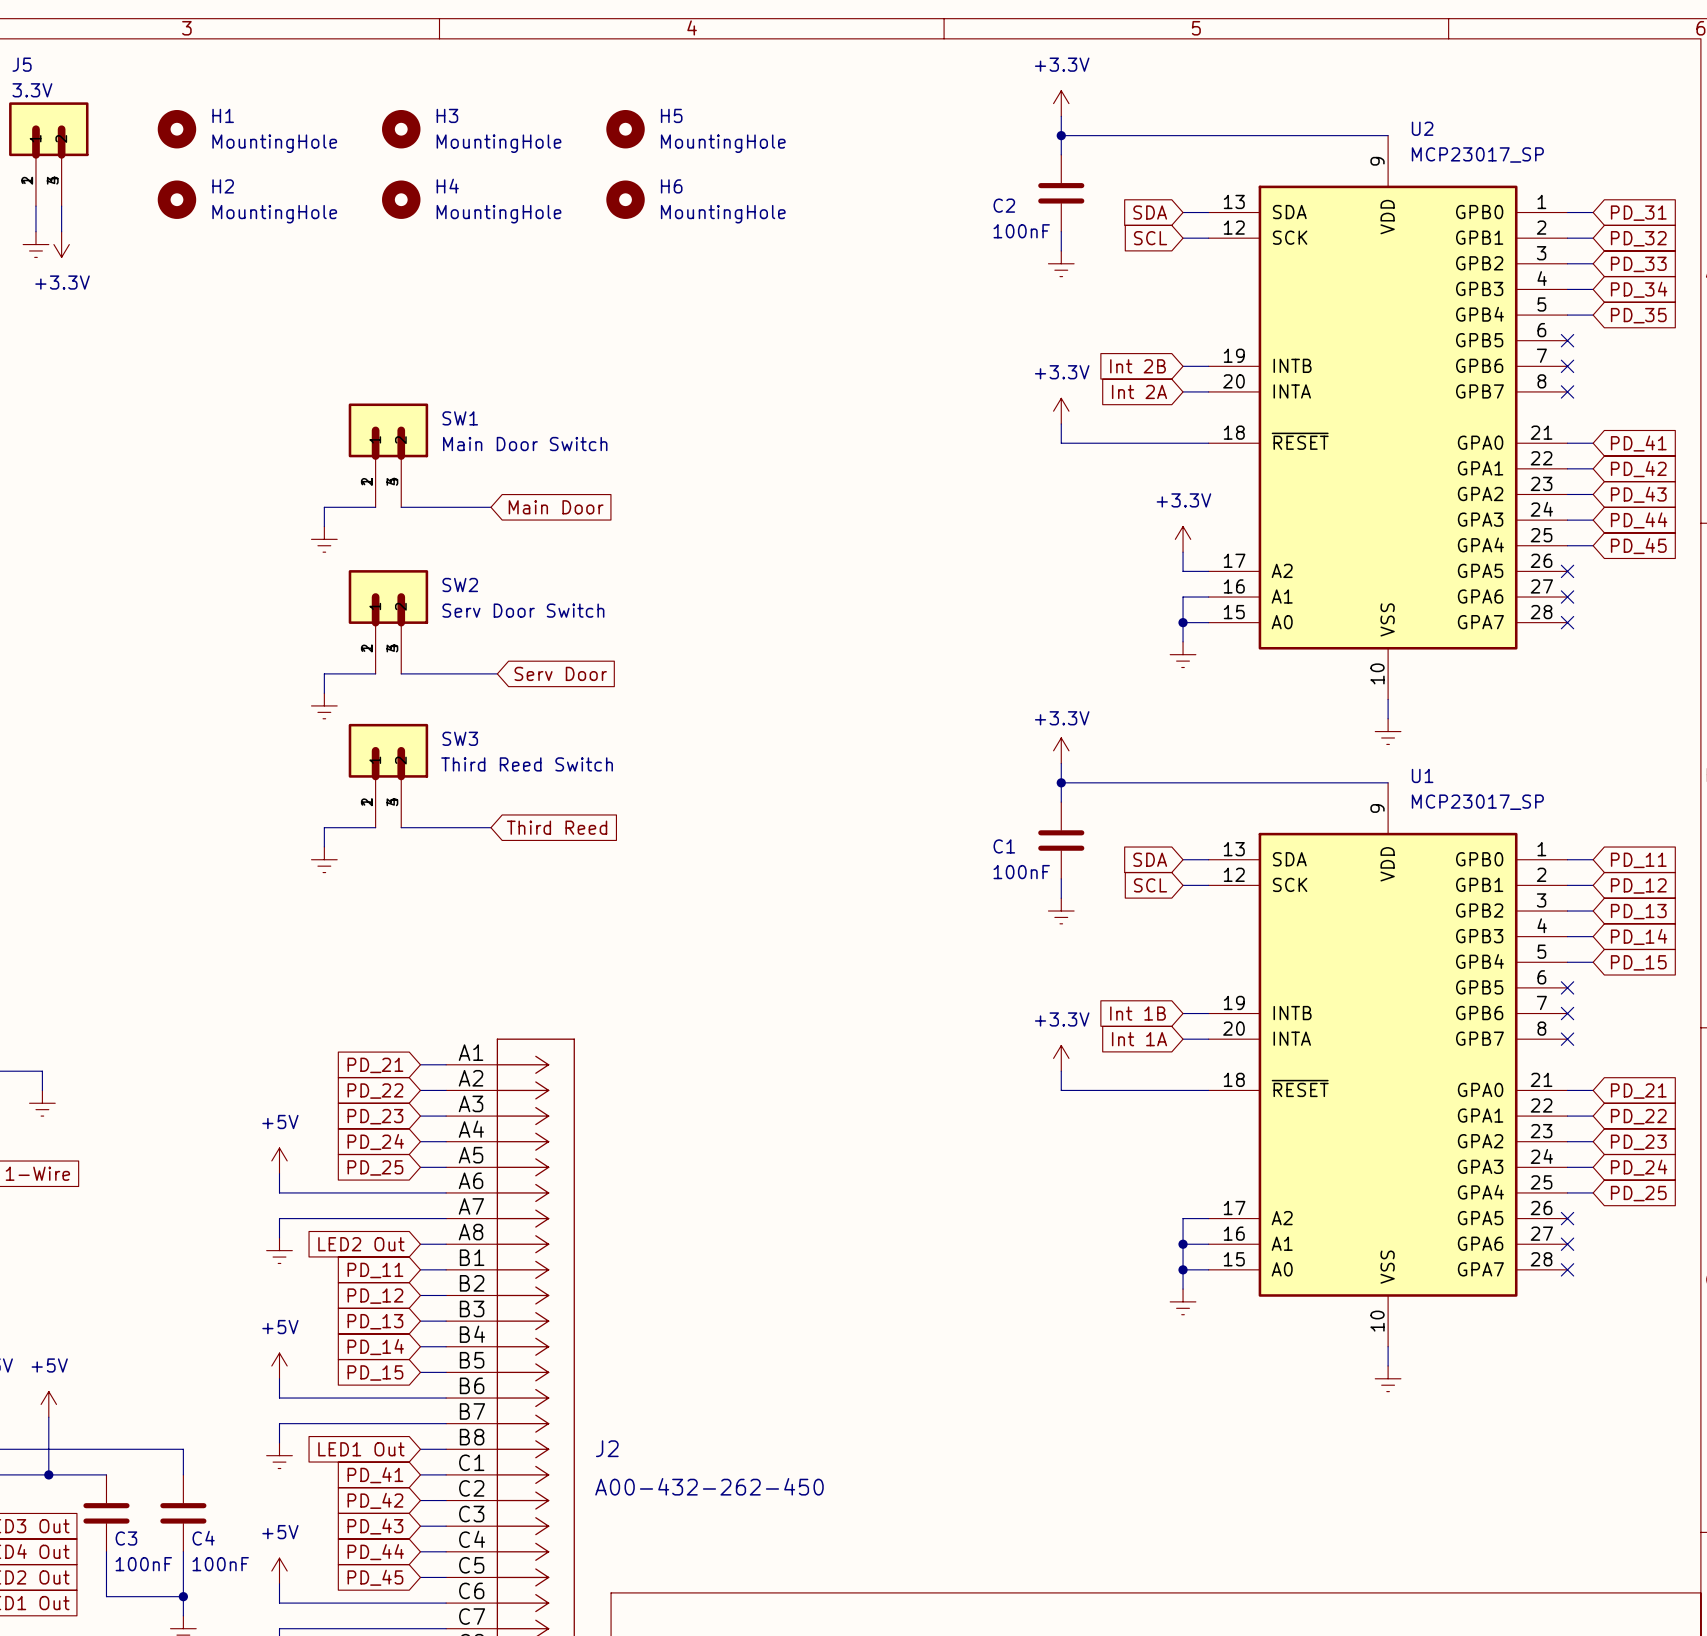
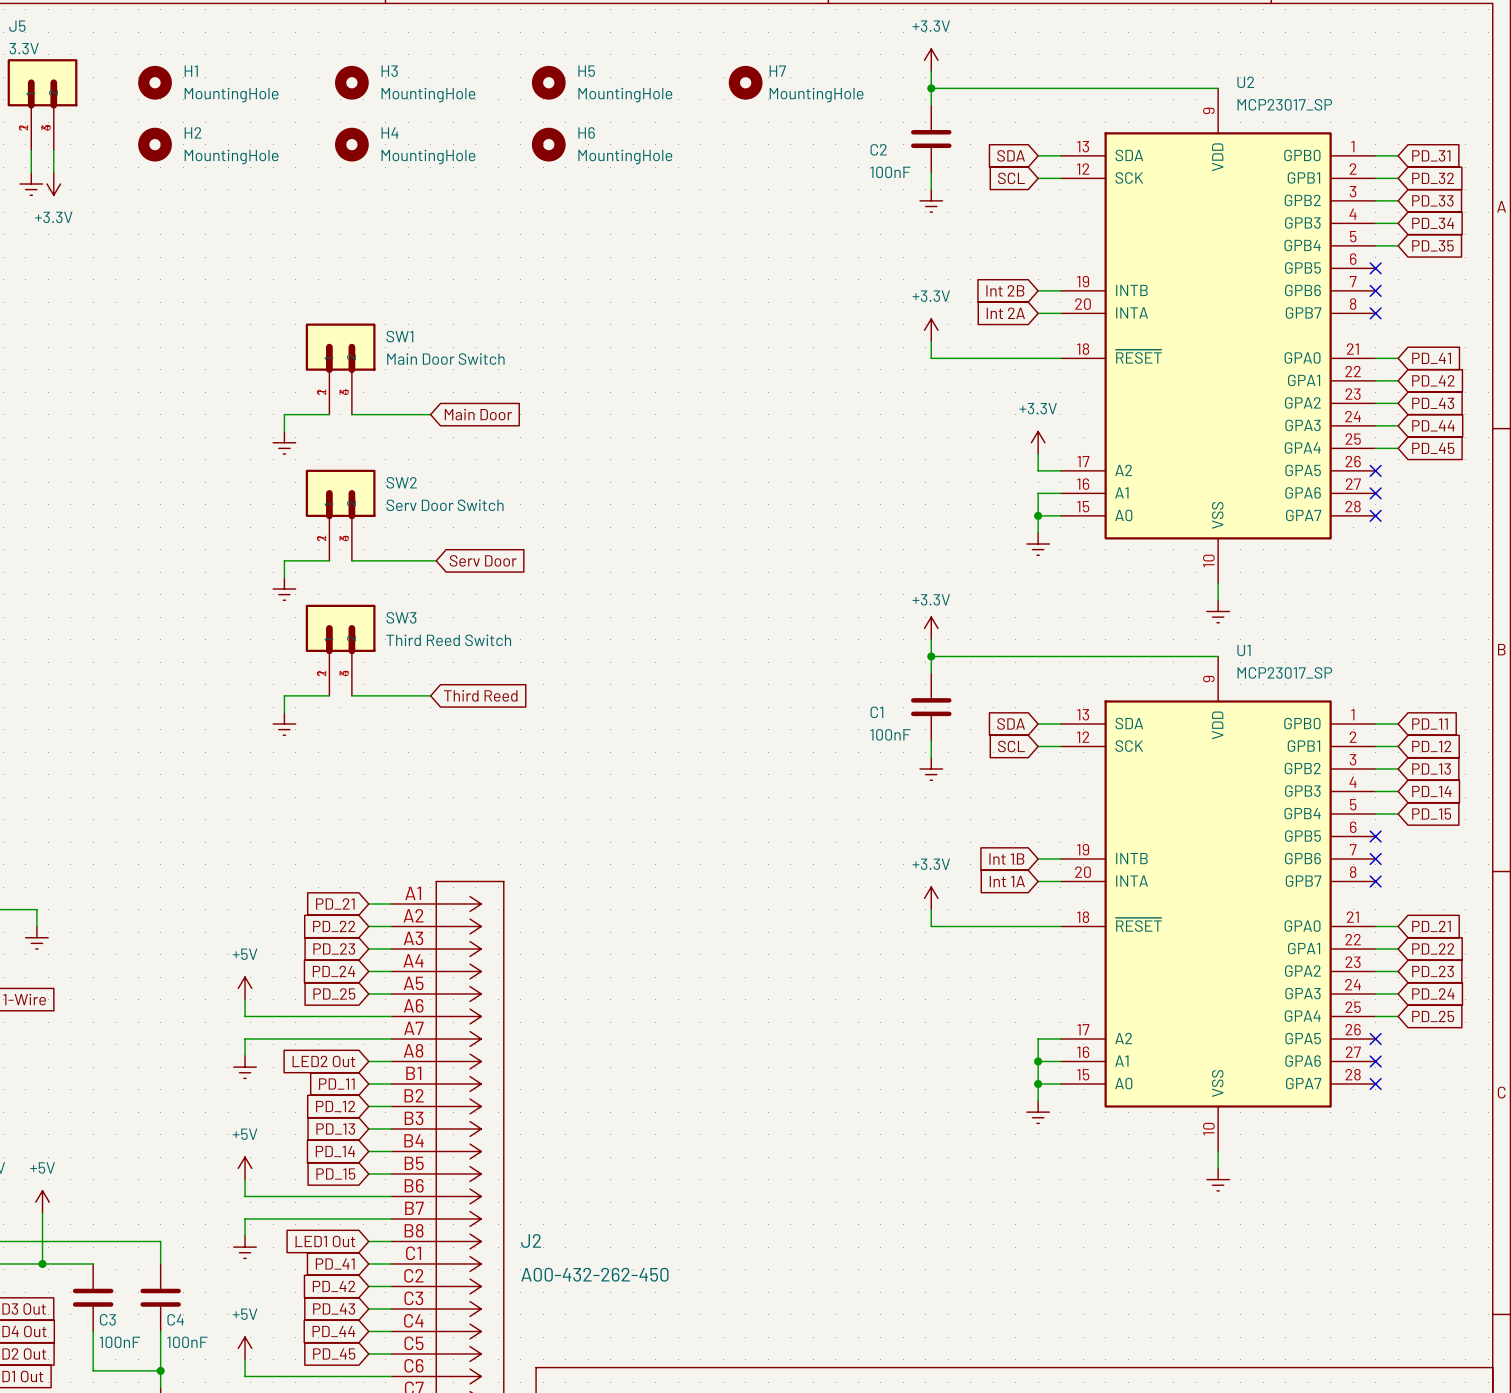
H7: none -> MountingHole (745, 82)

